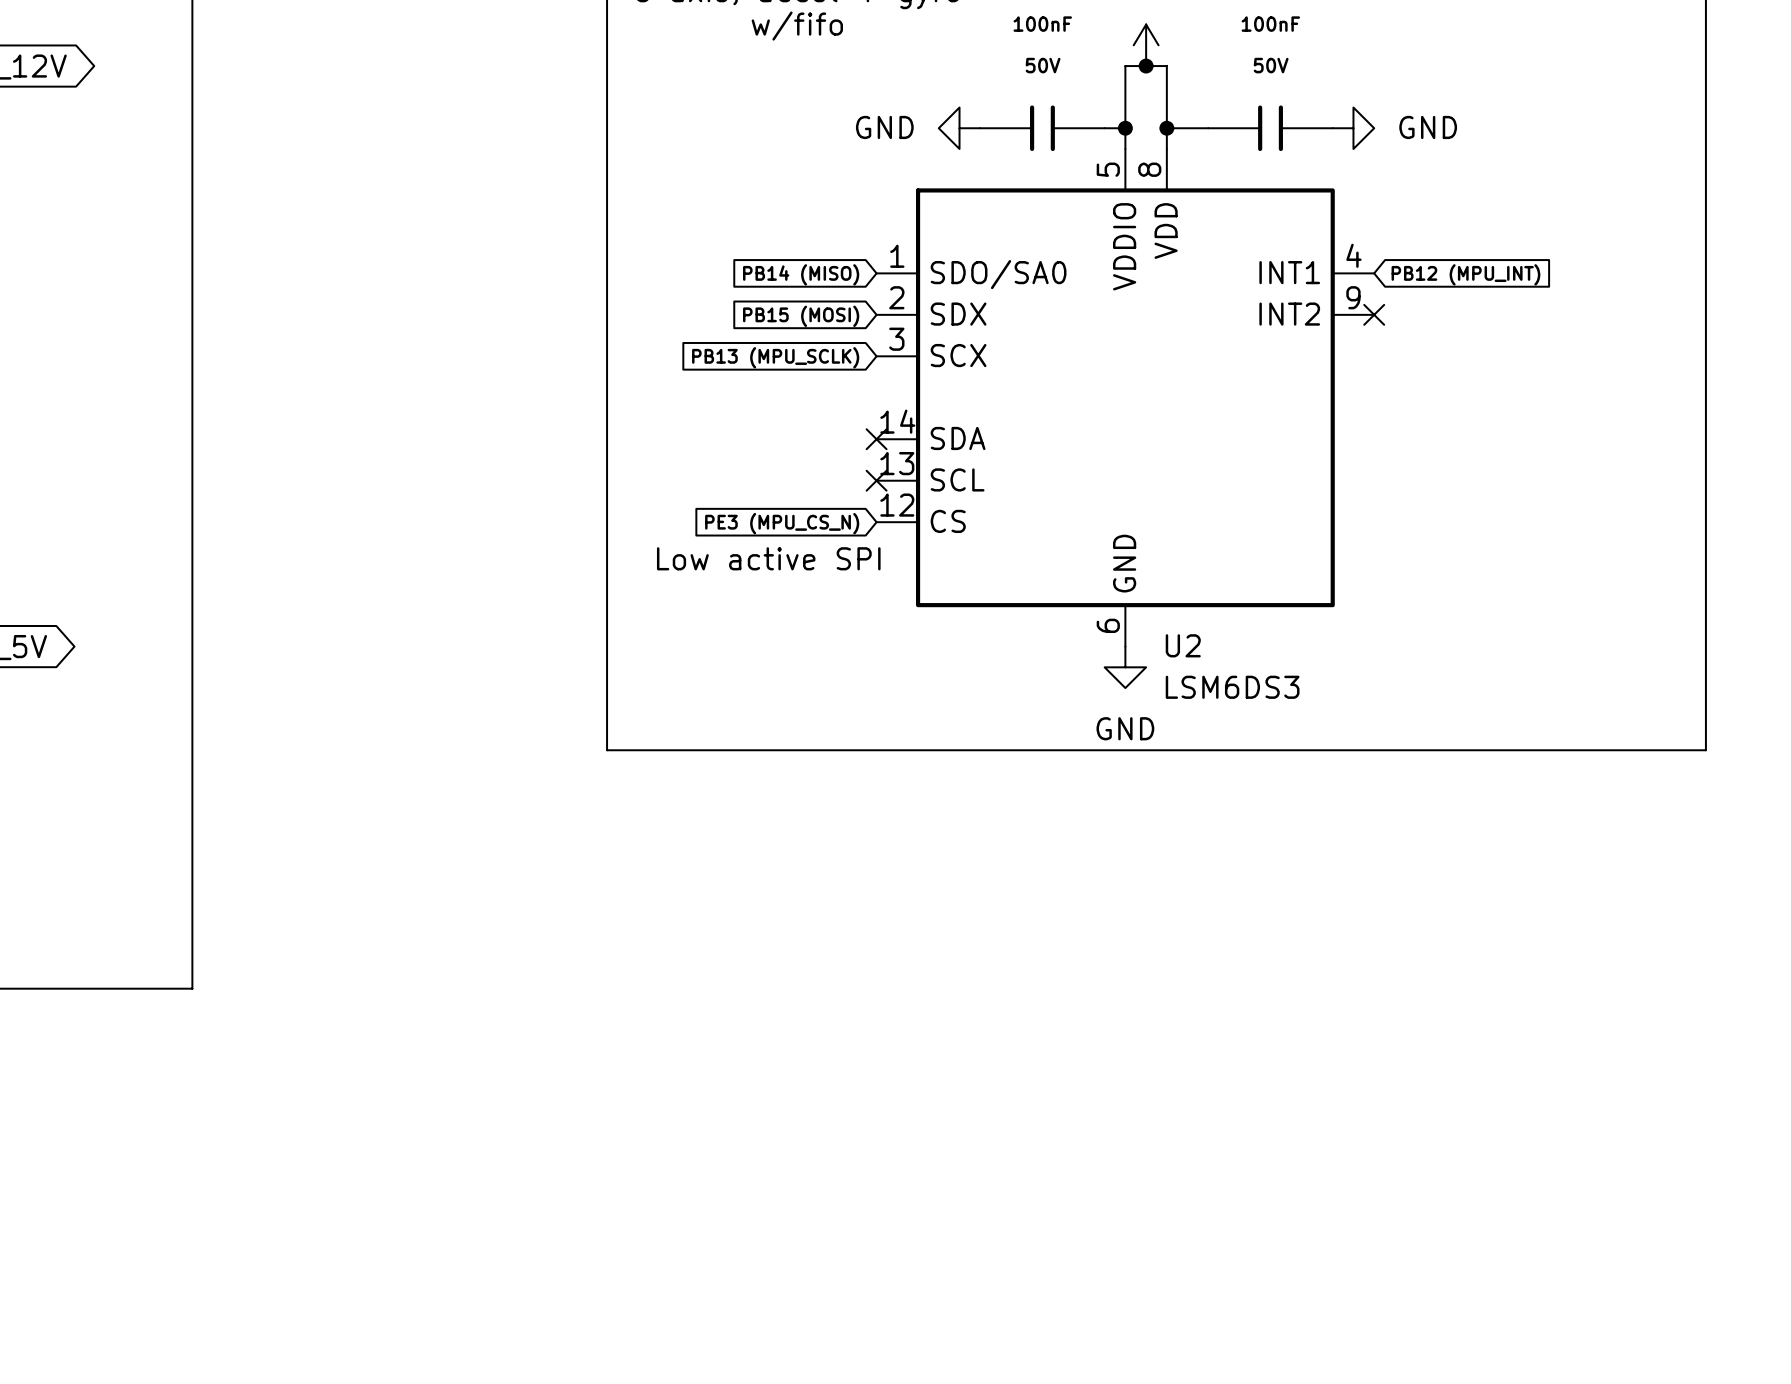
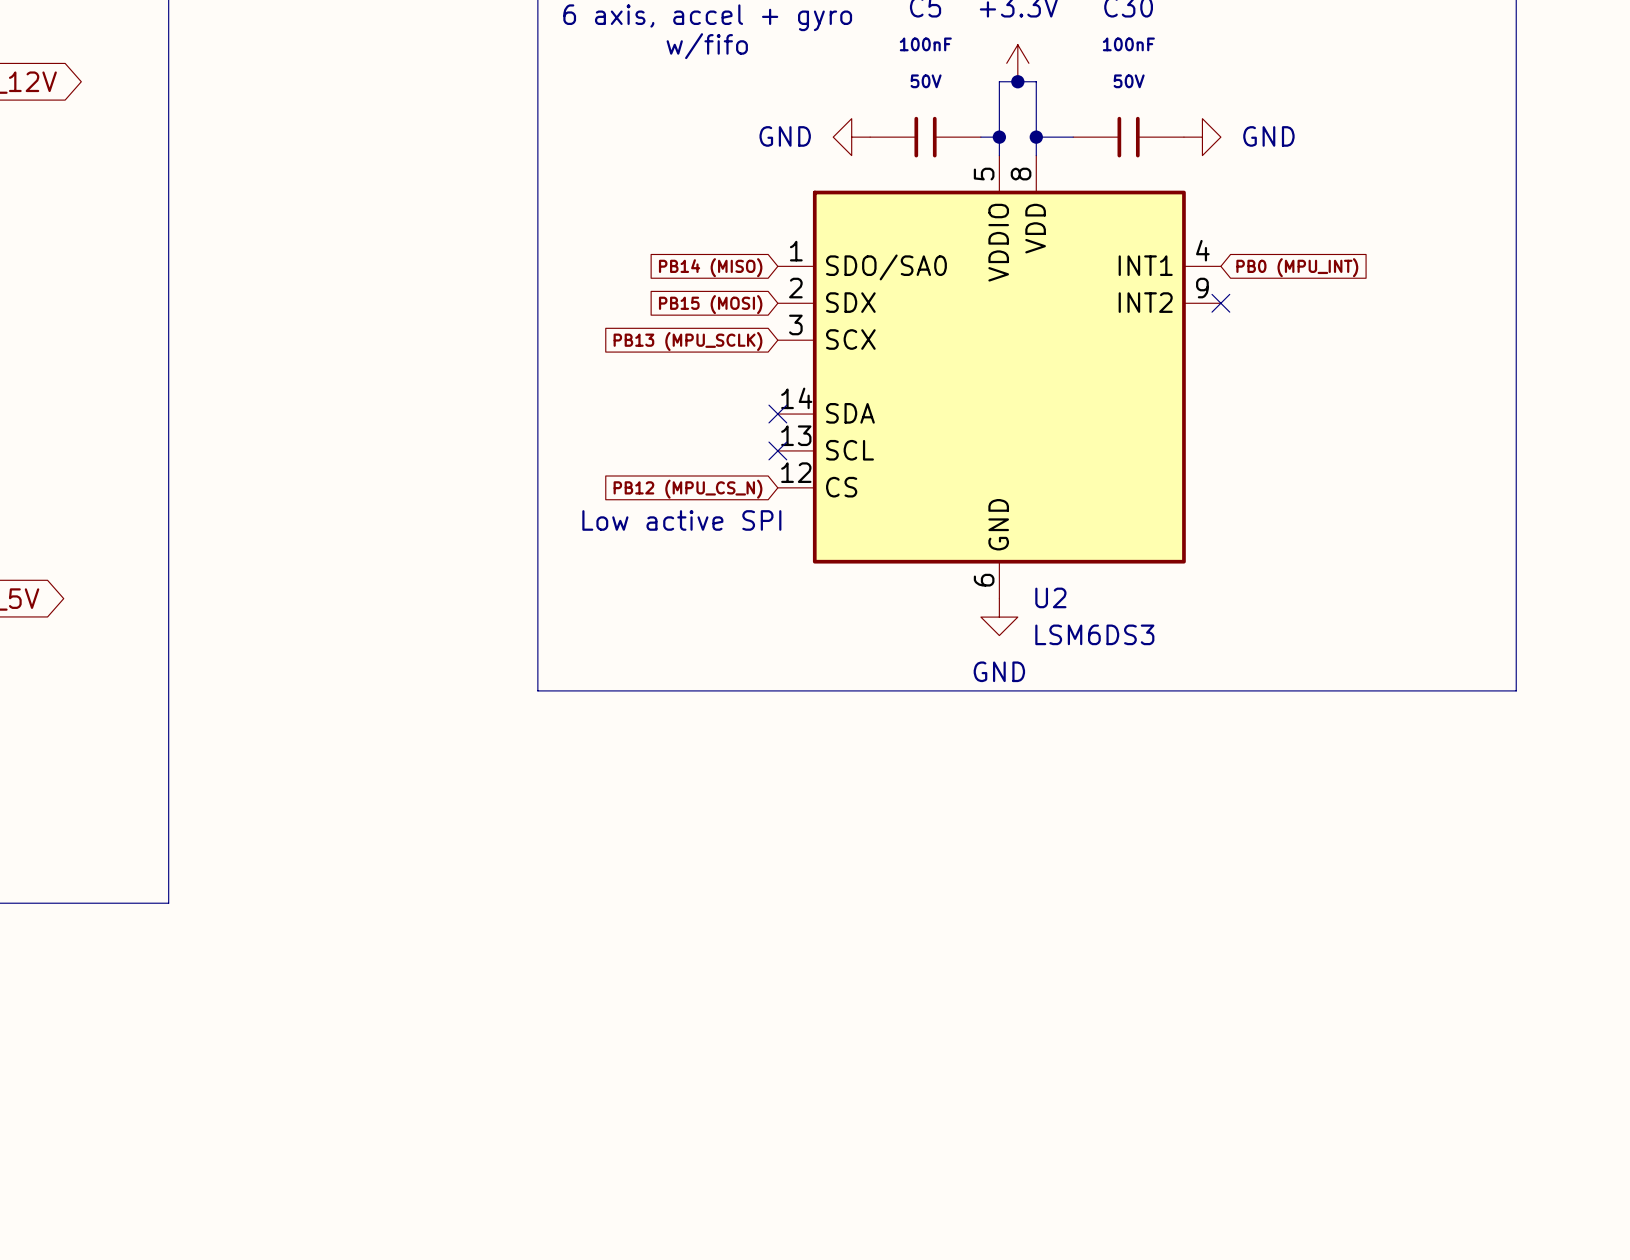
global label: PB12 (MPU_INT) (1465, 274) -> PB0 (MPU_INT) (1297, 267)
global label: PE3 (MPU_CS_N) (782, 523) -> PB12 (MPU_CS_N) (687, 489)

